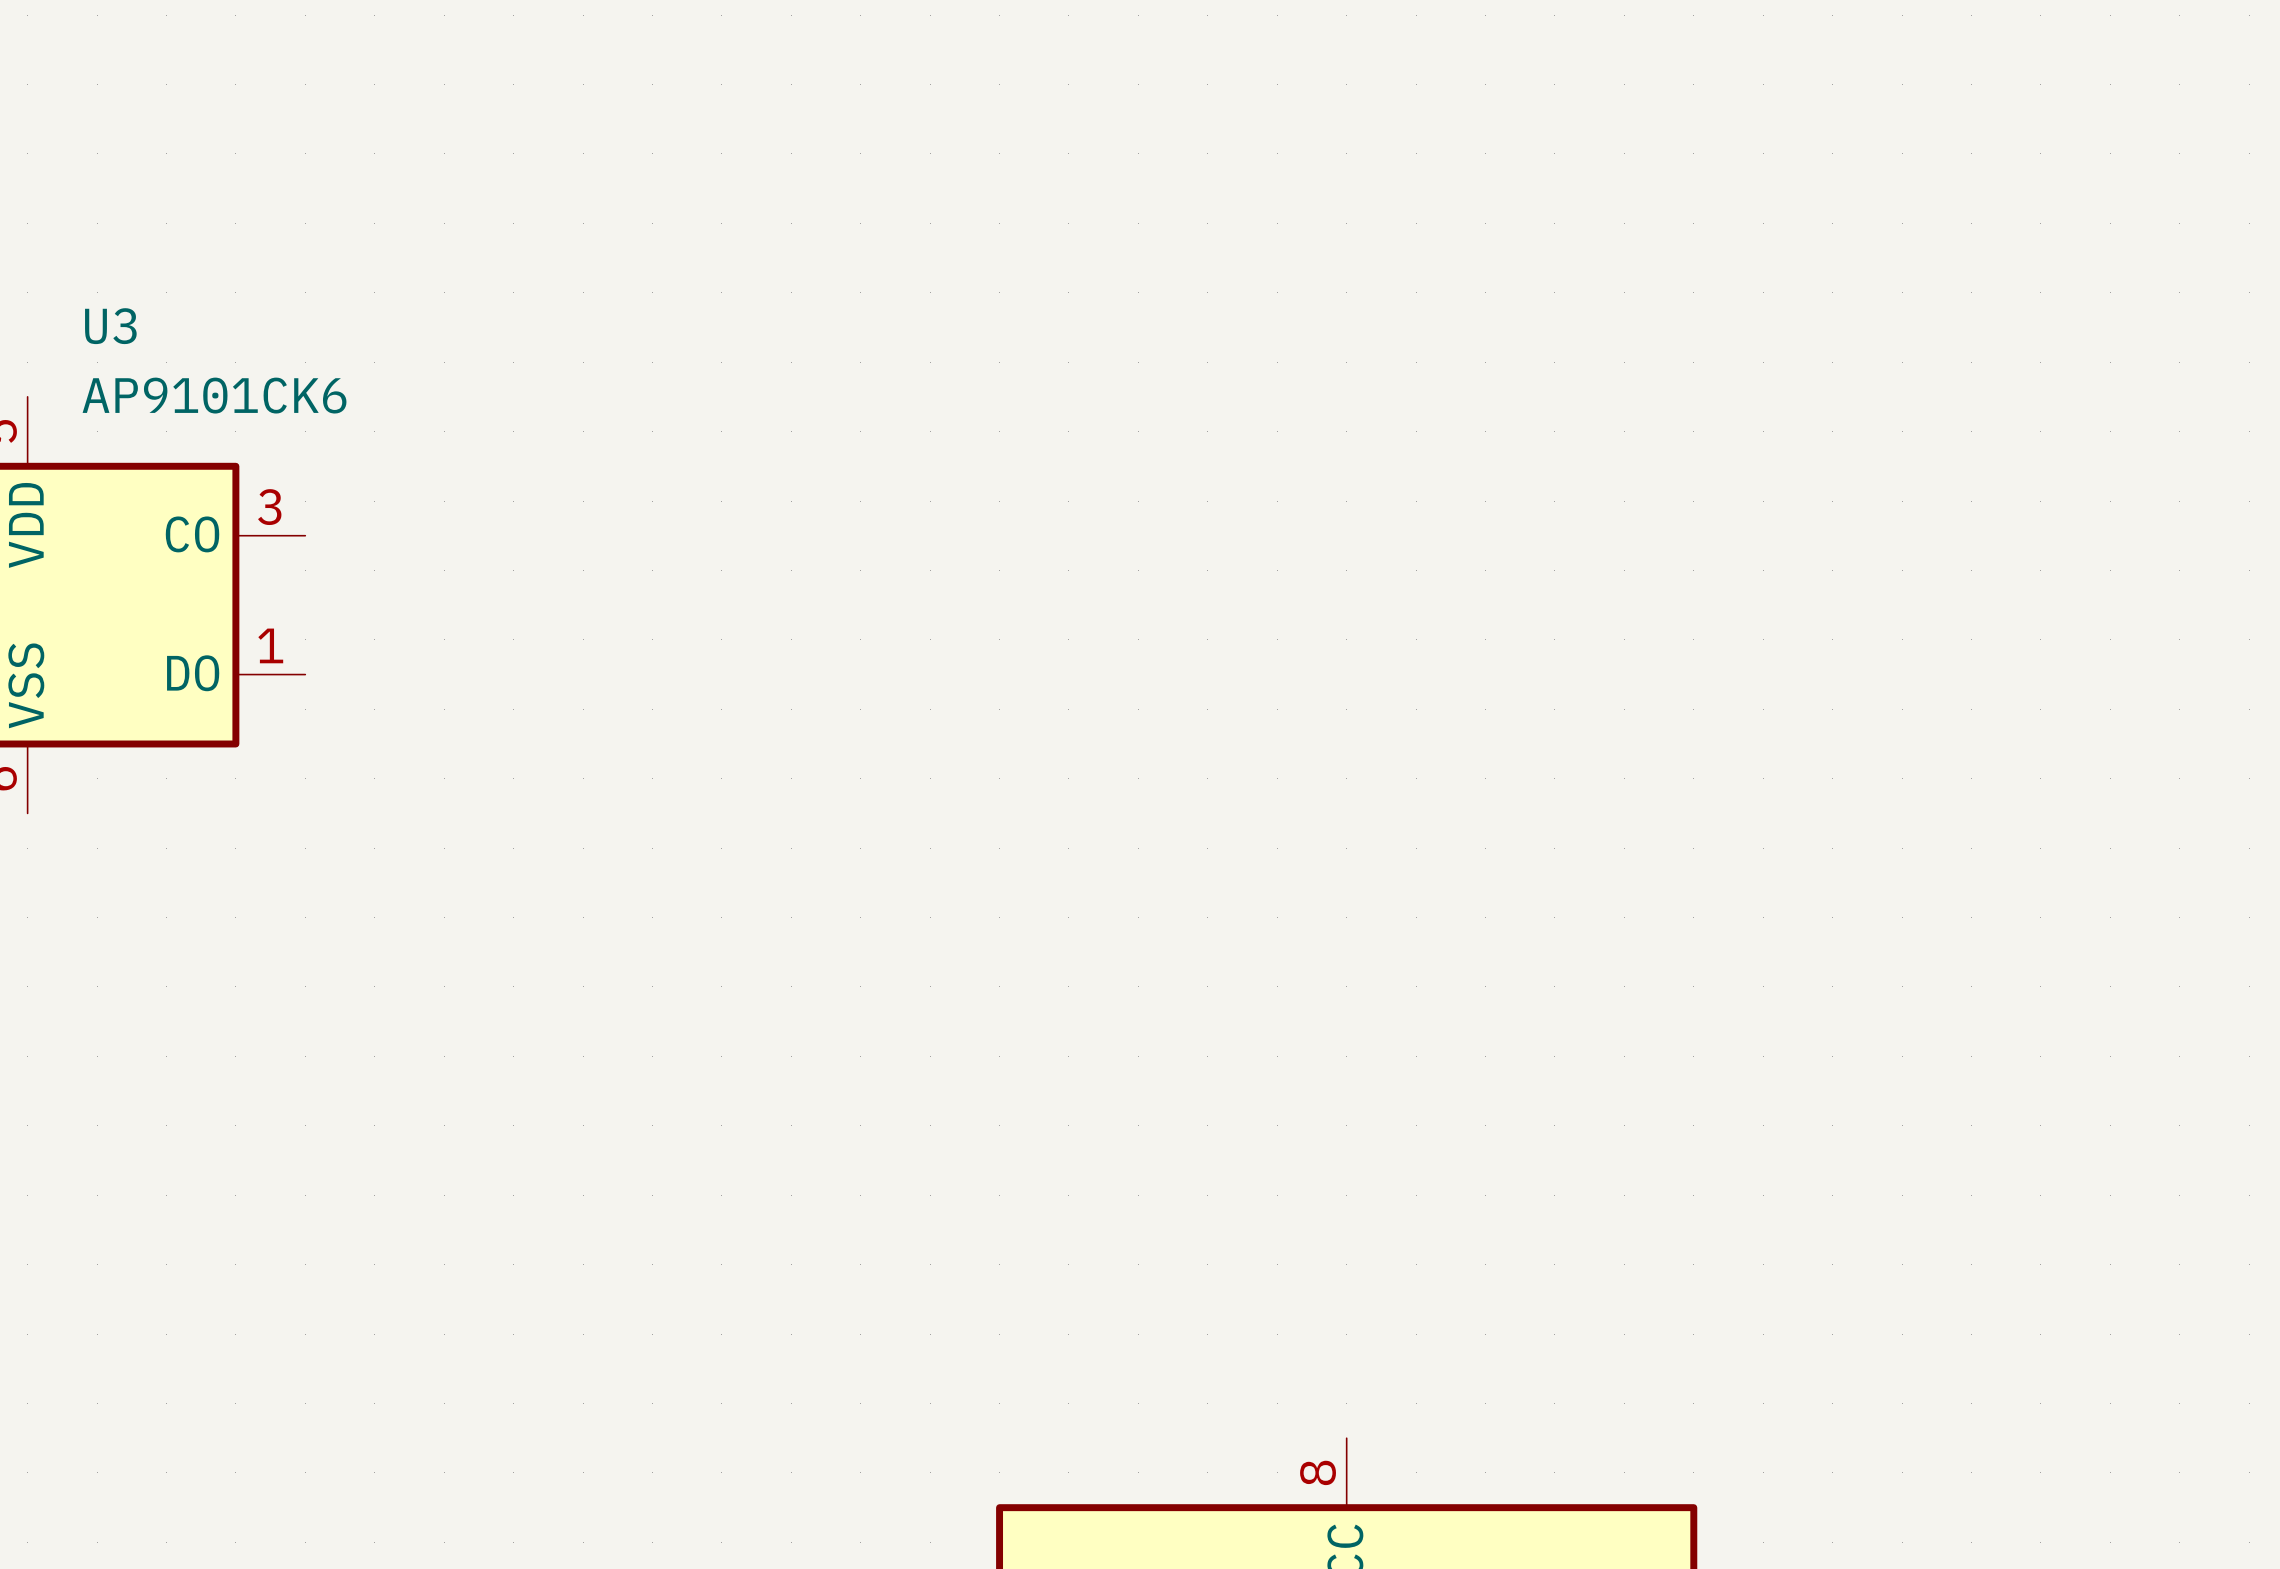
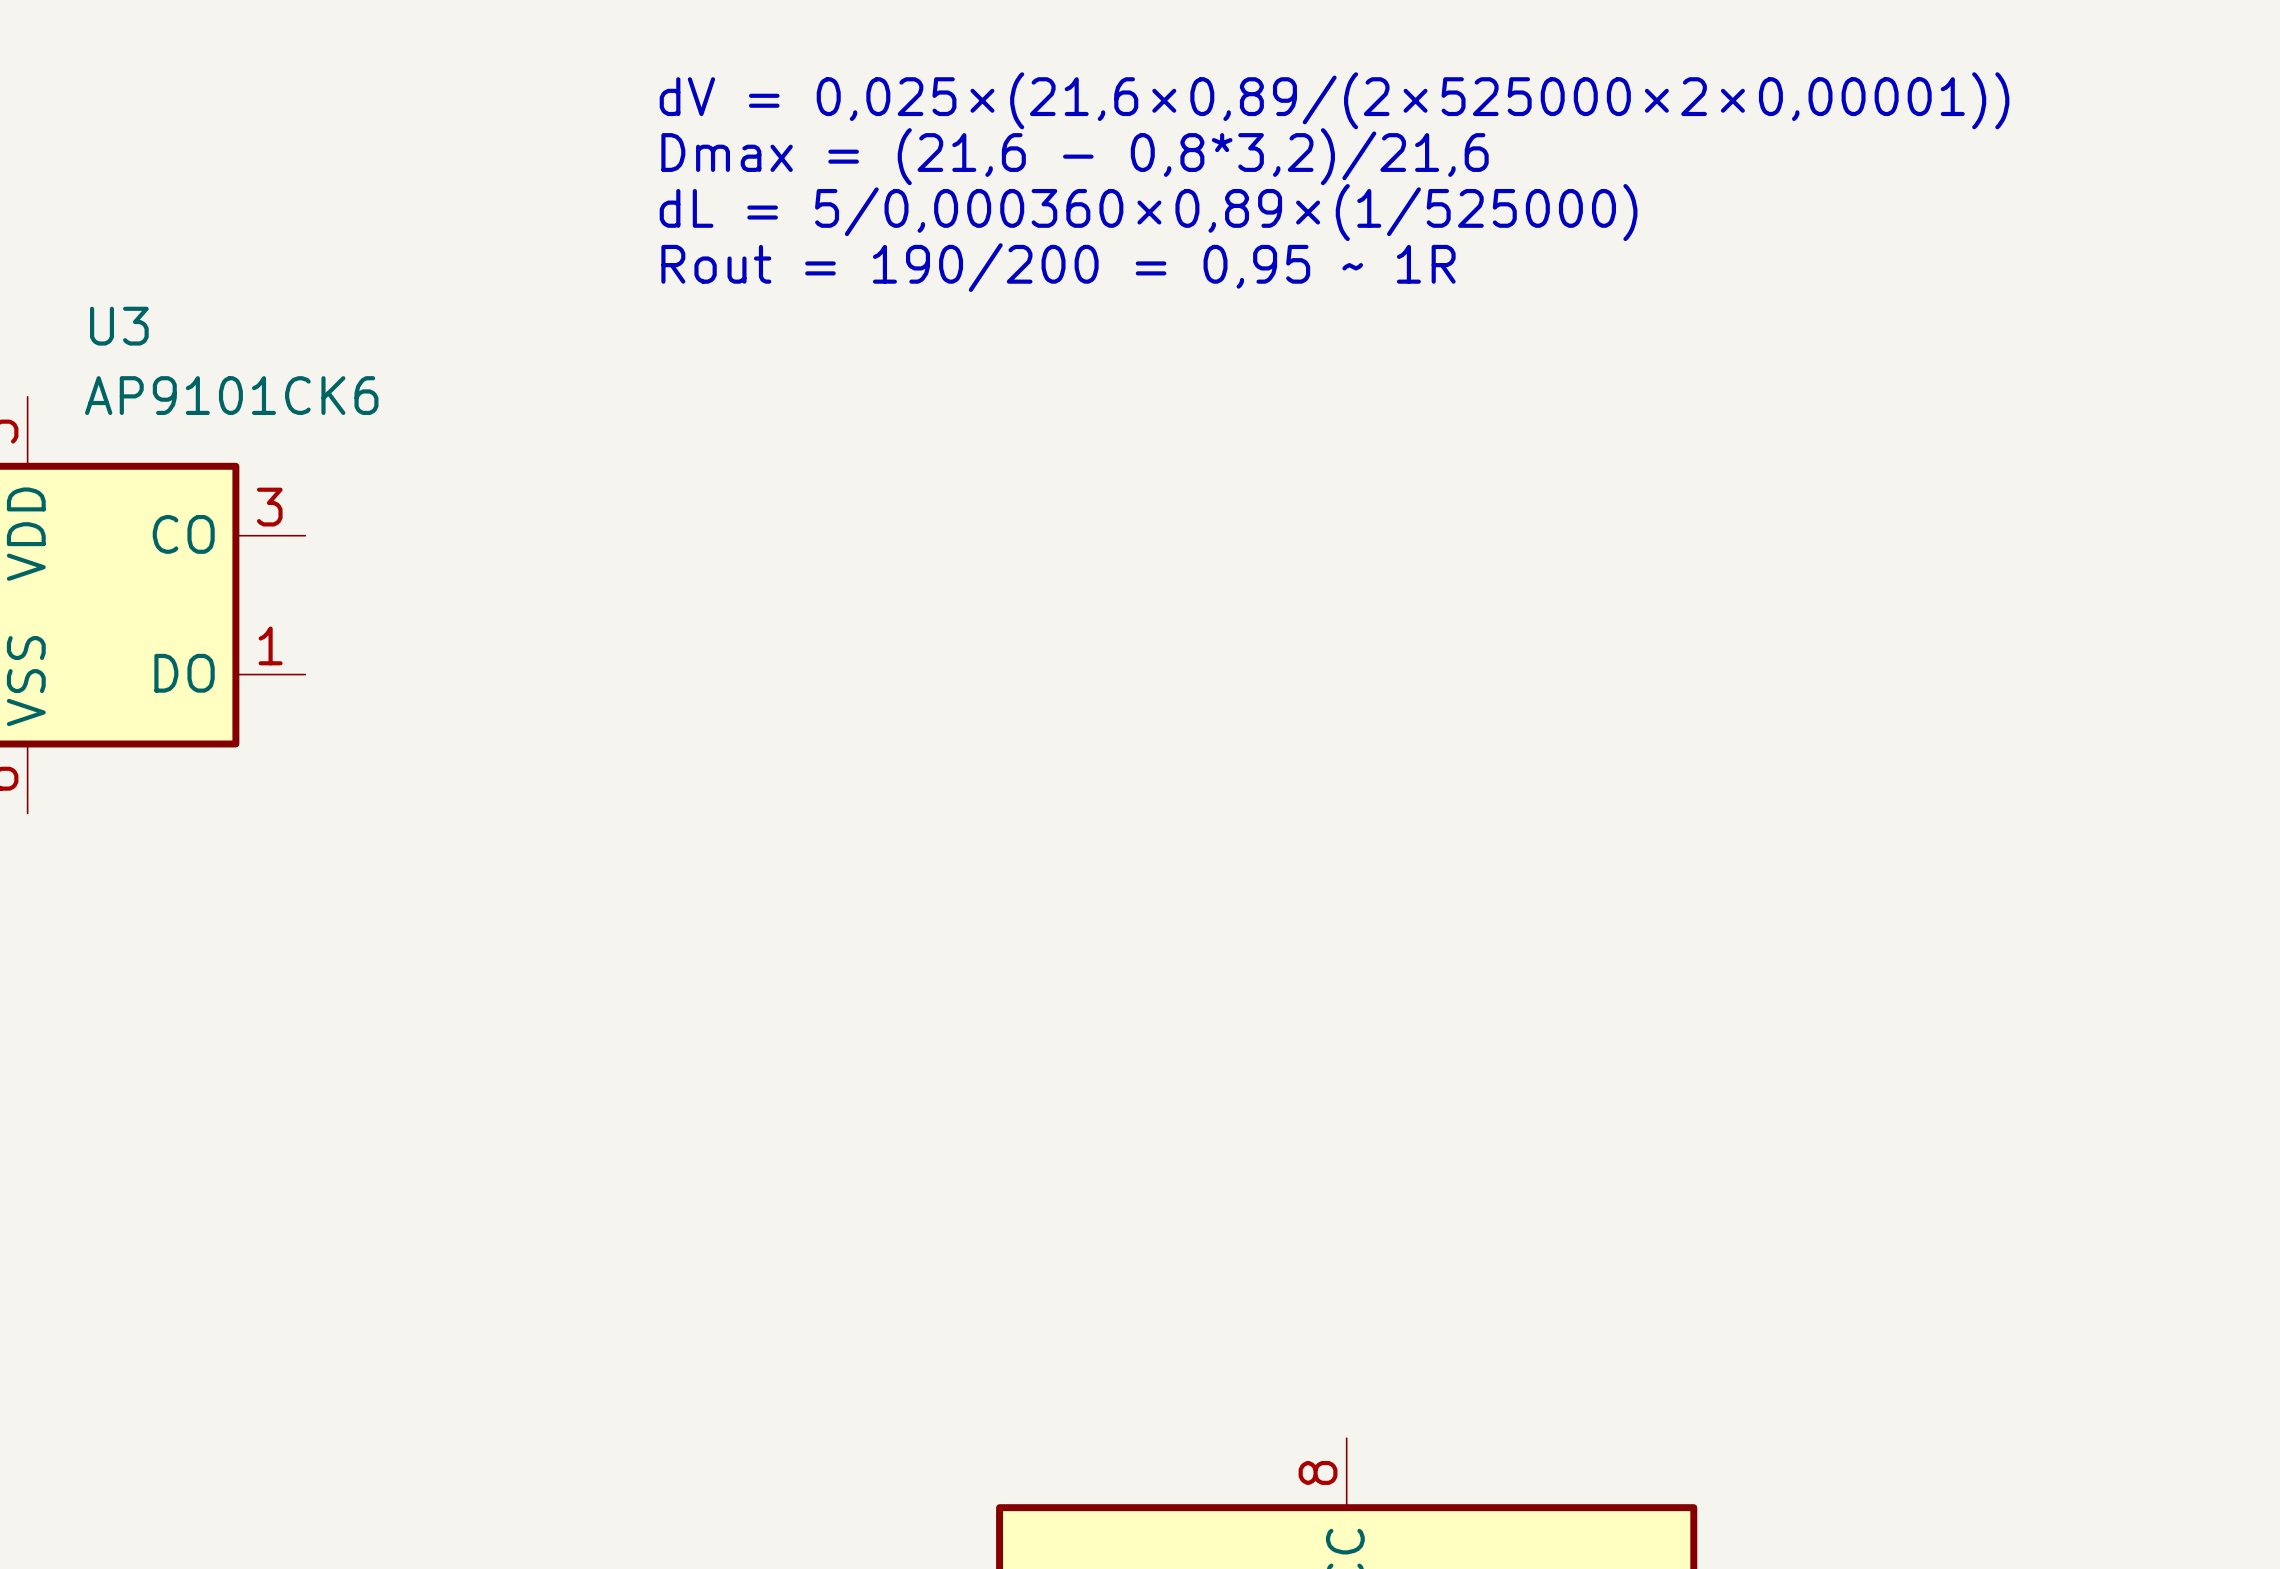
text: none -> dV = 0,025×(21,6×0,89/(2×525000×2×0,00001)) (1334, 100)
text: none -> Dmax = (21,6 - 0,8*3,2)/21,6 (1075, 156)
text: none -> dL = 5/0,000360×0,89×(1/525000) (1148, 212)
text: none -> Rout = 190/200 = 0,95 ~ 1R (1058, 267)

